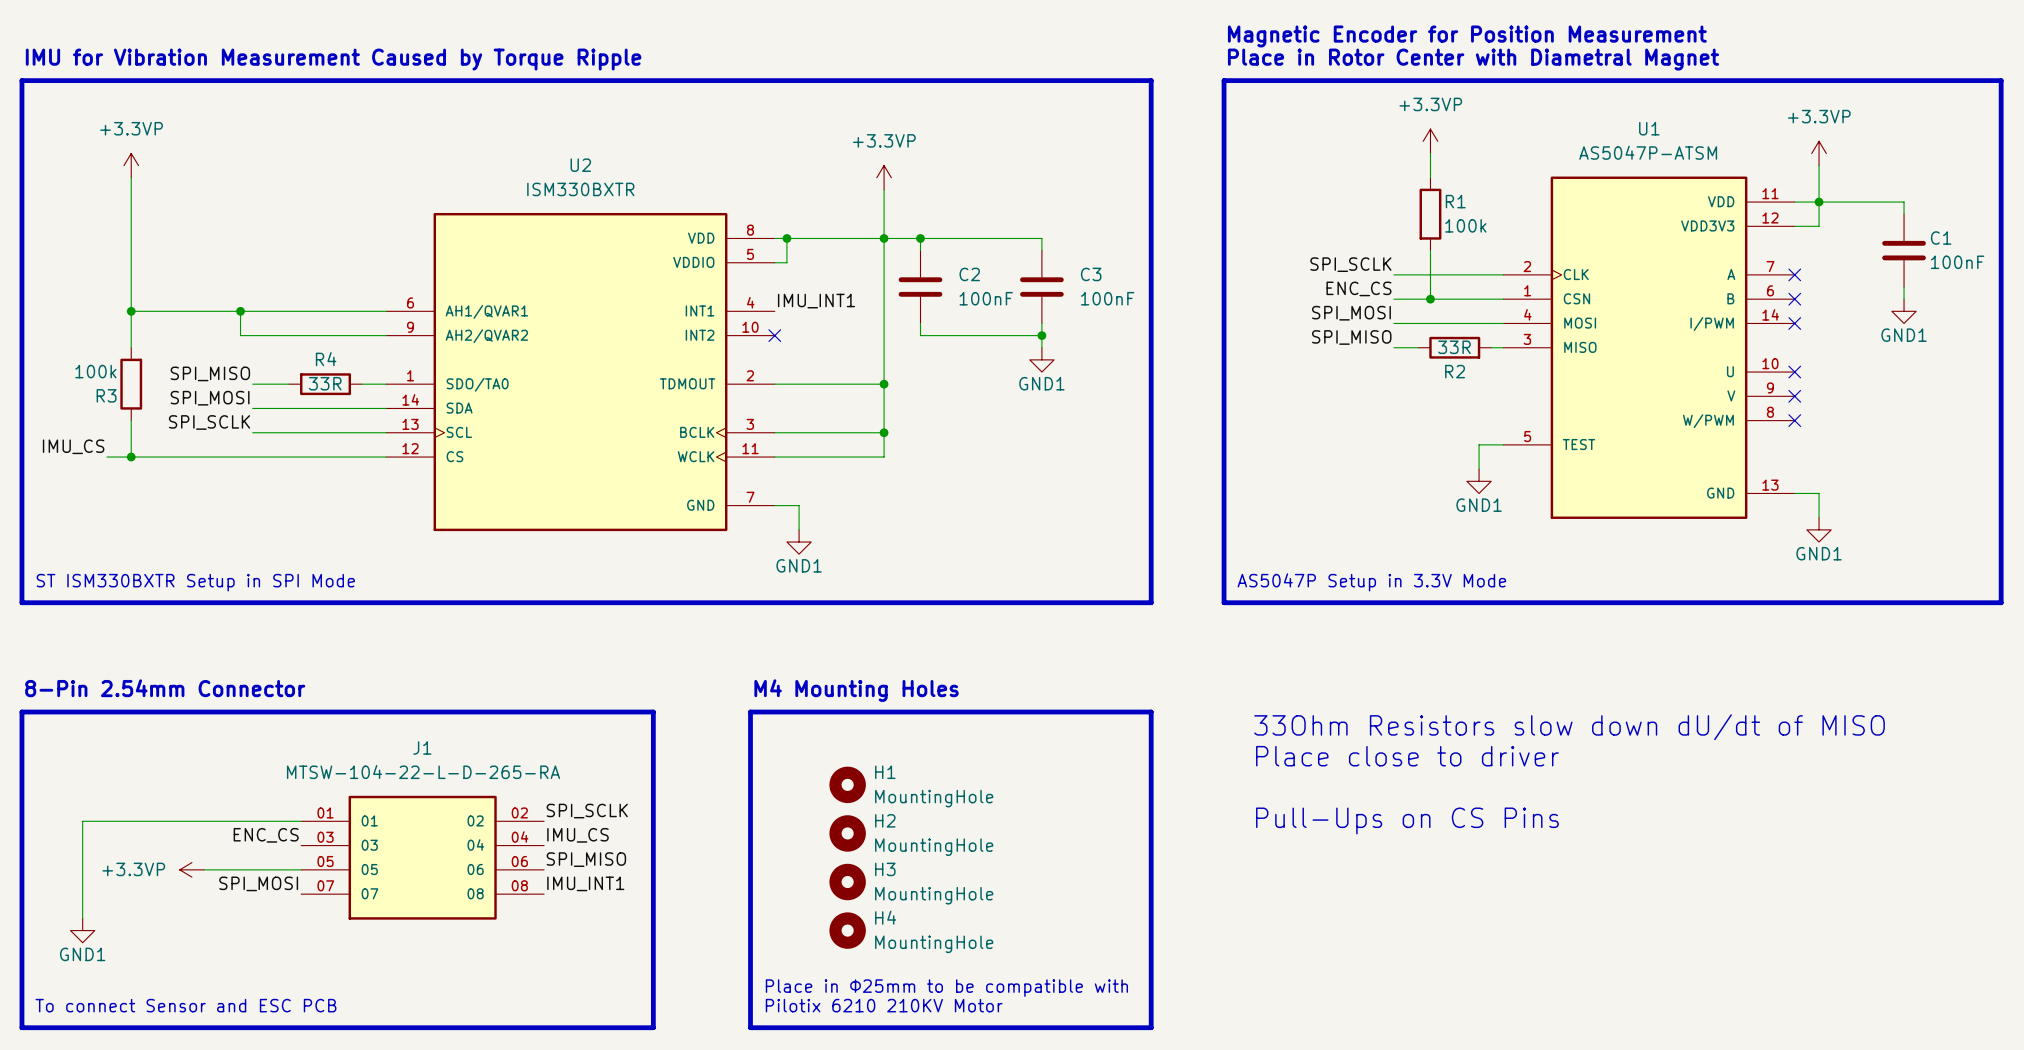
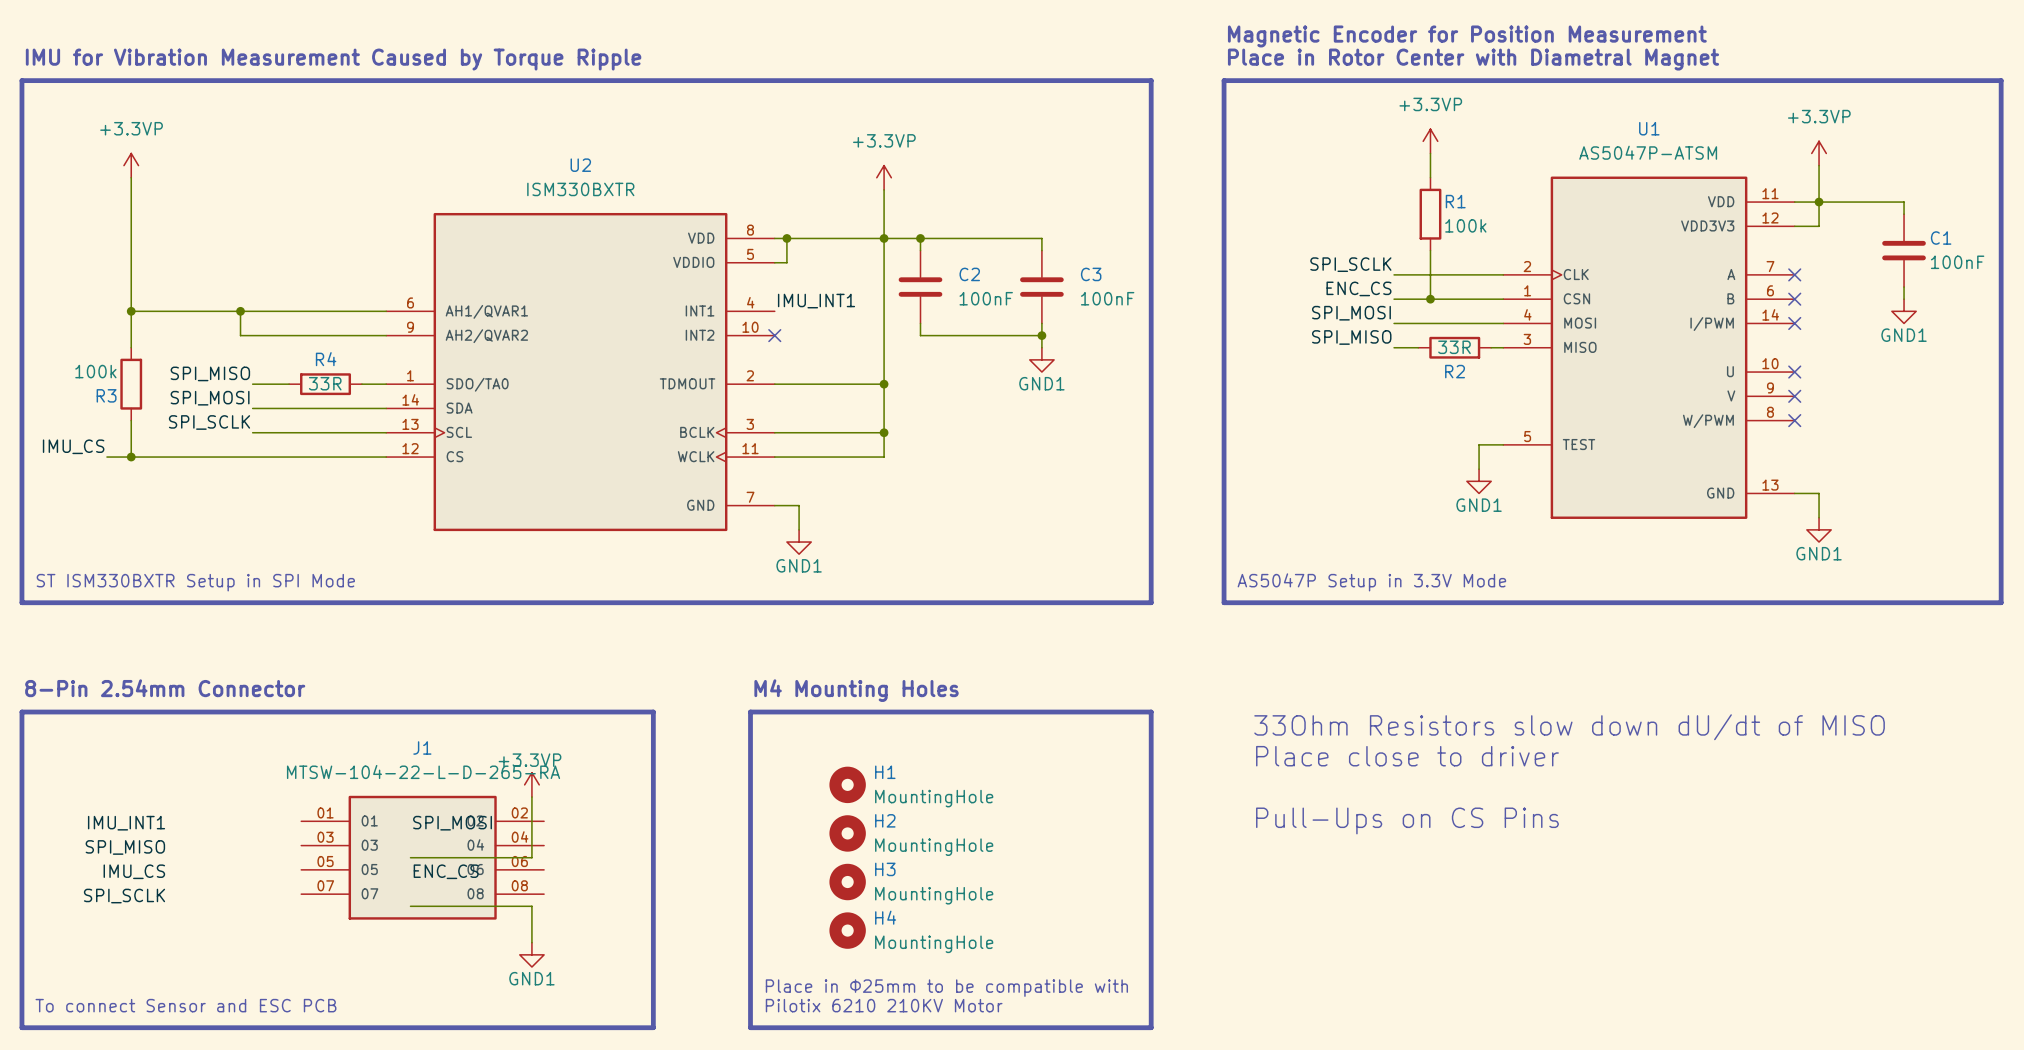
power symbol: none -> +3.3VP (531, 784)
wire: none -> (531, 797) (531, 857) (410, 857)
label: SPI_SCLK (587, 811) -> none
wire: (301, 821) (82, 821) (82, 918) -> none
label: none -> IMU_INT1 (126, 823)
label position: ENC_CS (266, 835) -> ENC_CS (446, 871)
label: IMU_CS (578, 835) -> none
label: none -> SPI_MISO (125, 847)
label: SPI_MISO (586, 859) -> none
power symbol: +3.3VP (191, 869) -> none
wire: (204, 869) (301, 869) -> none
label: none -> IMU_CS (134, 871)
label position: SPI_MOSI (258, 883) -> SPI_MOSI (452, 823)
label: IMU_INT1 (585, 883) -> none
label: none -> SPI_SCLK (124, 896)
wire: none -> (410, 906) (531, 906) (531, 942)
power symbol: GND1 (82, 930) -> none
power symbol: none -> GND1 (531, 954)

